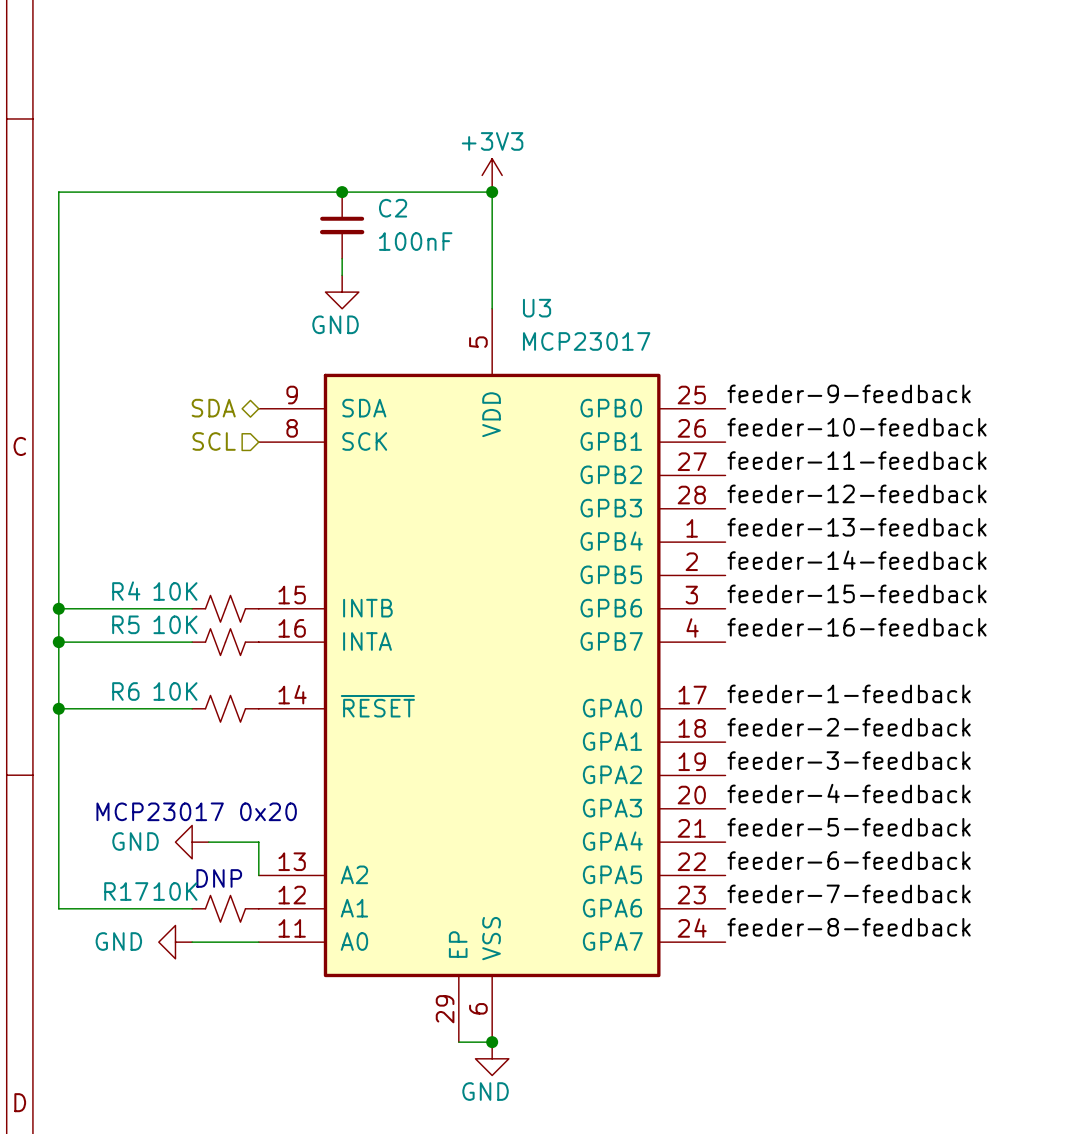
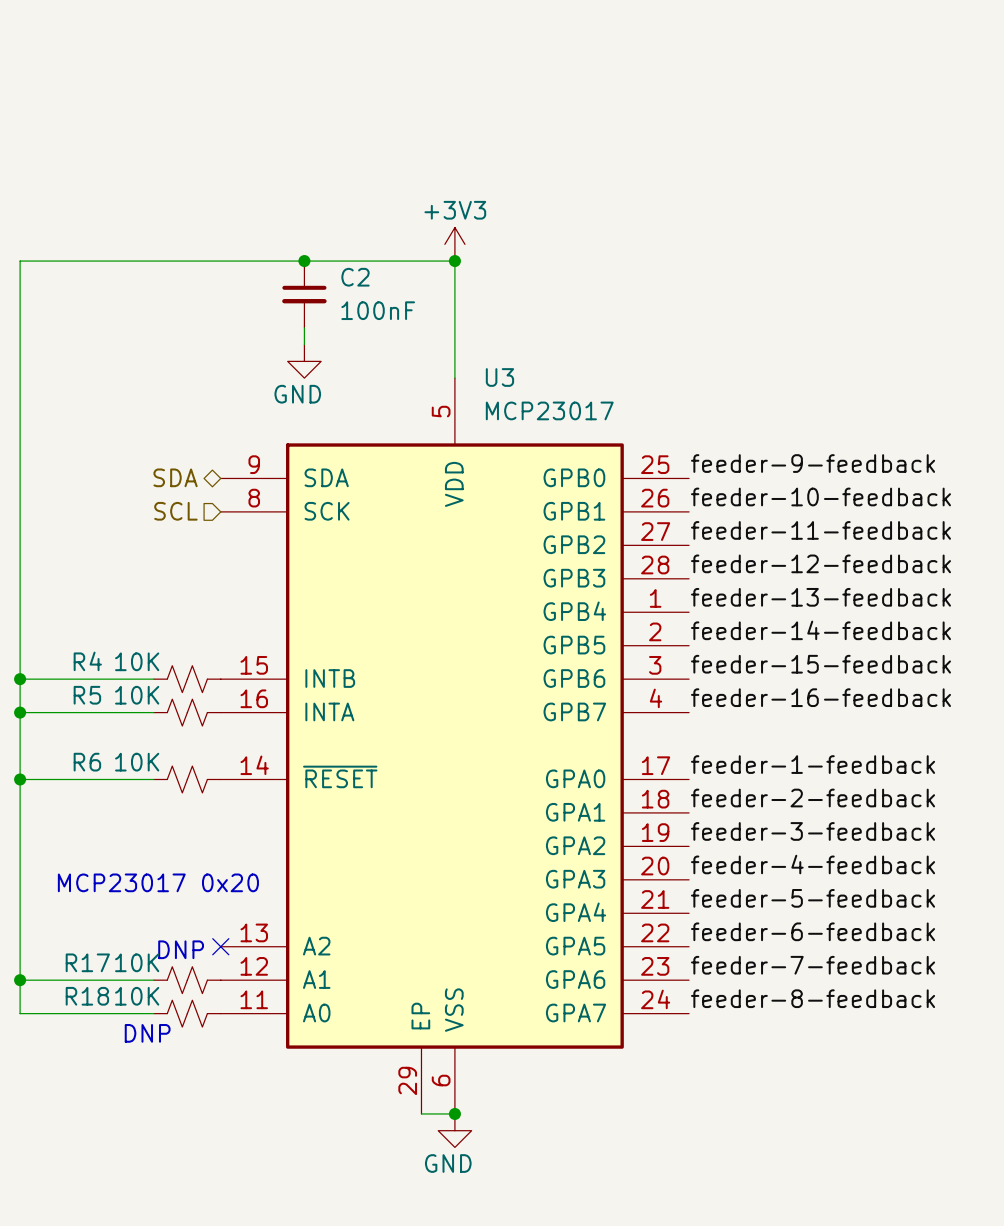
power symbol: GND (192, 842) -> none
wire: (208, 842) (258, 842) (258, 875) -> none
no-connect mark: none -> (220, 946)
junction: none -> (20, 980)
power symbol: GND (175, 942) -> none
wire: (192, 942) (258, 942) -> (153, 1013) (20, 1013) (20, 980)
R18: none -> 10K (187, 1013)
text: none -> DNP (147, 1033)

